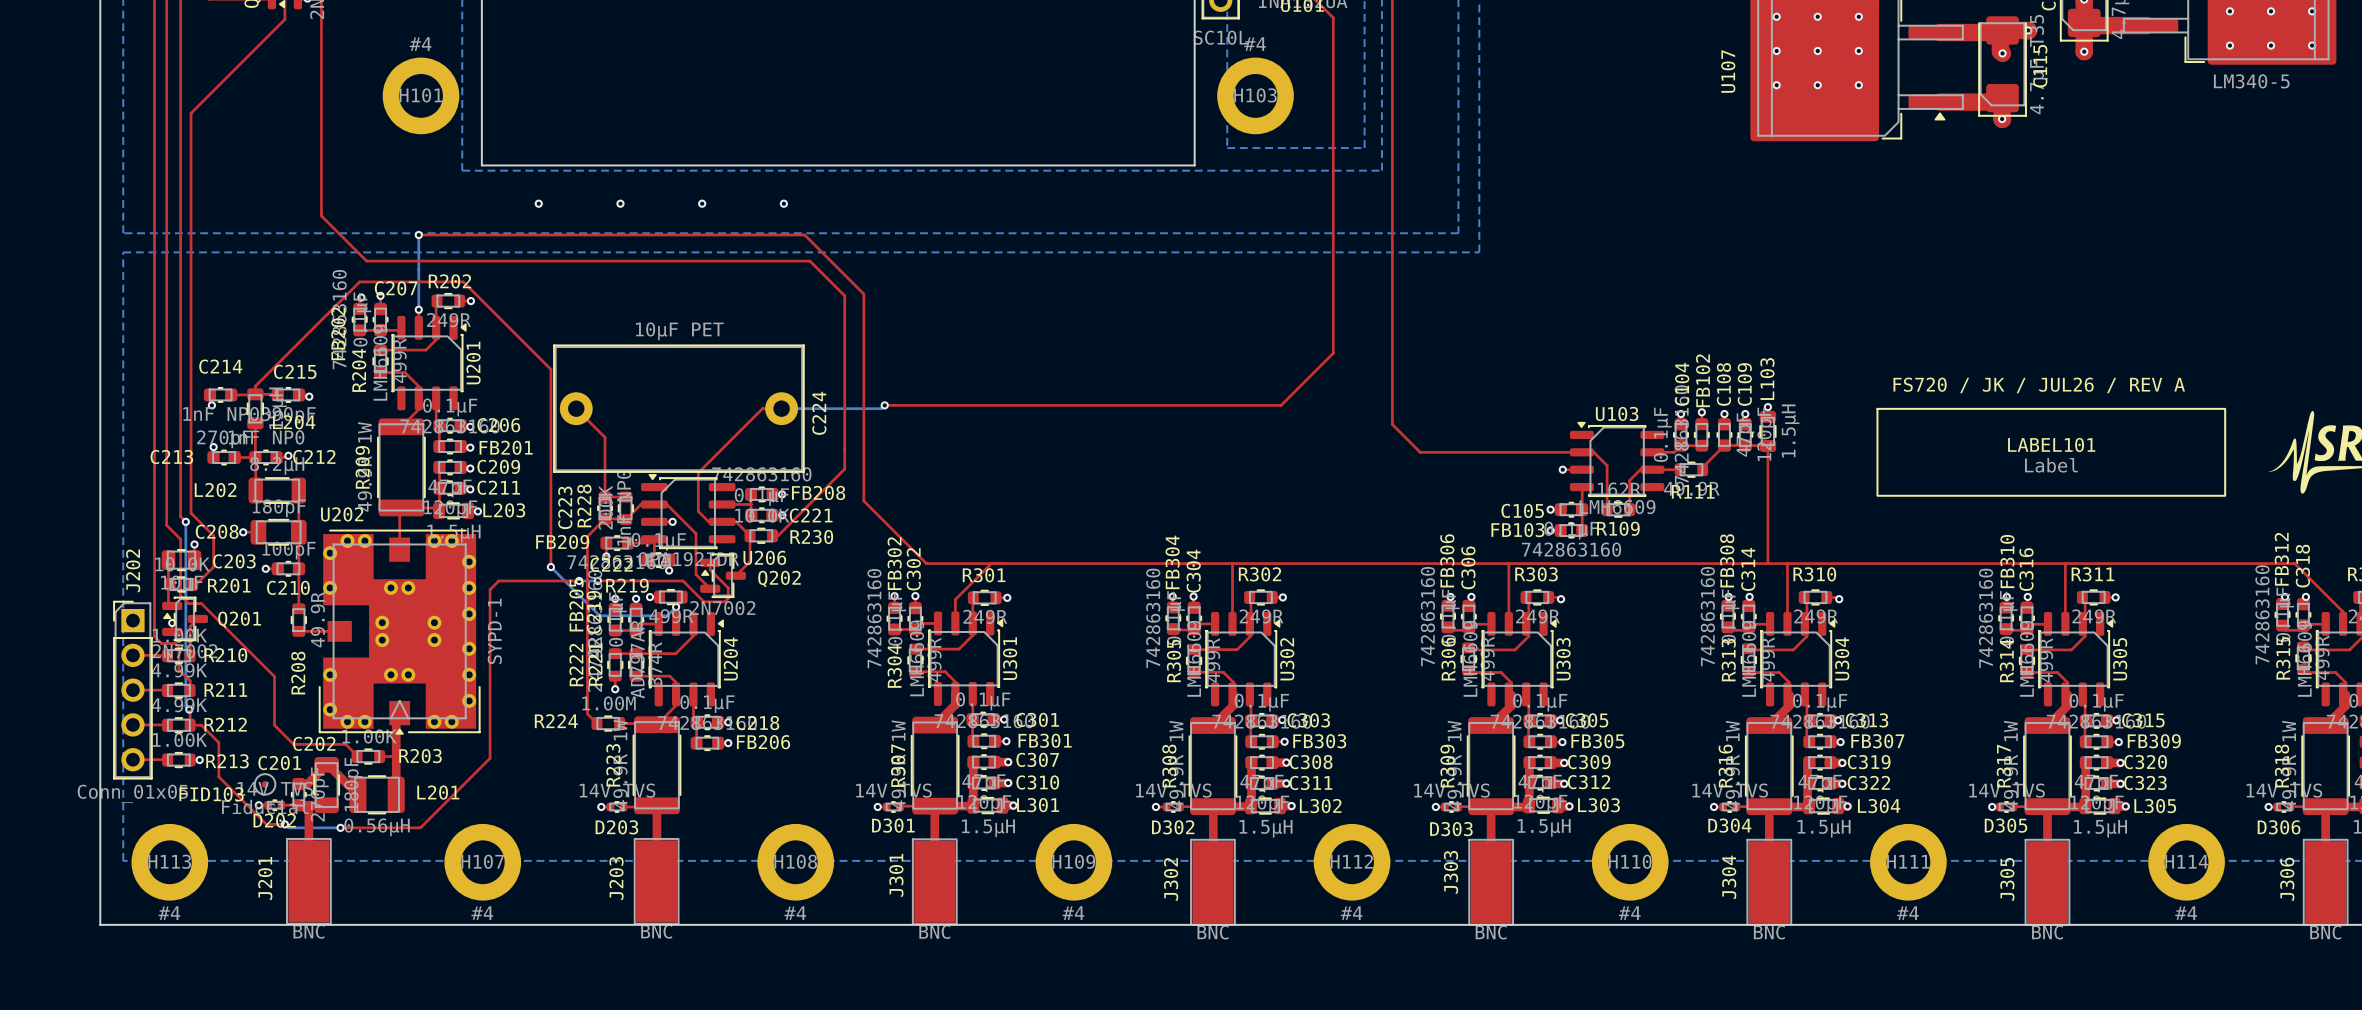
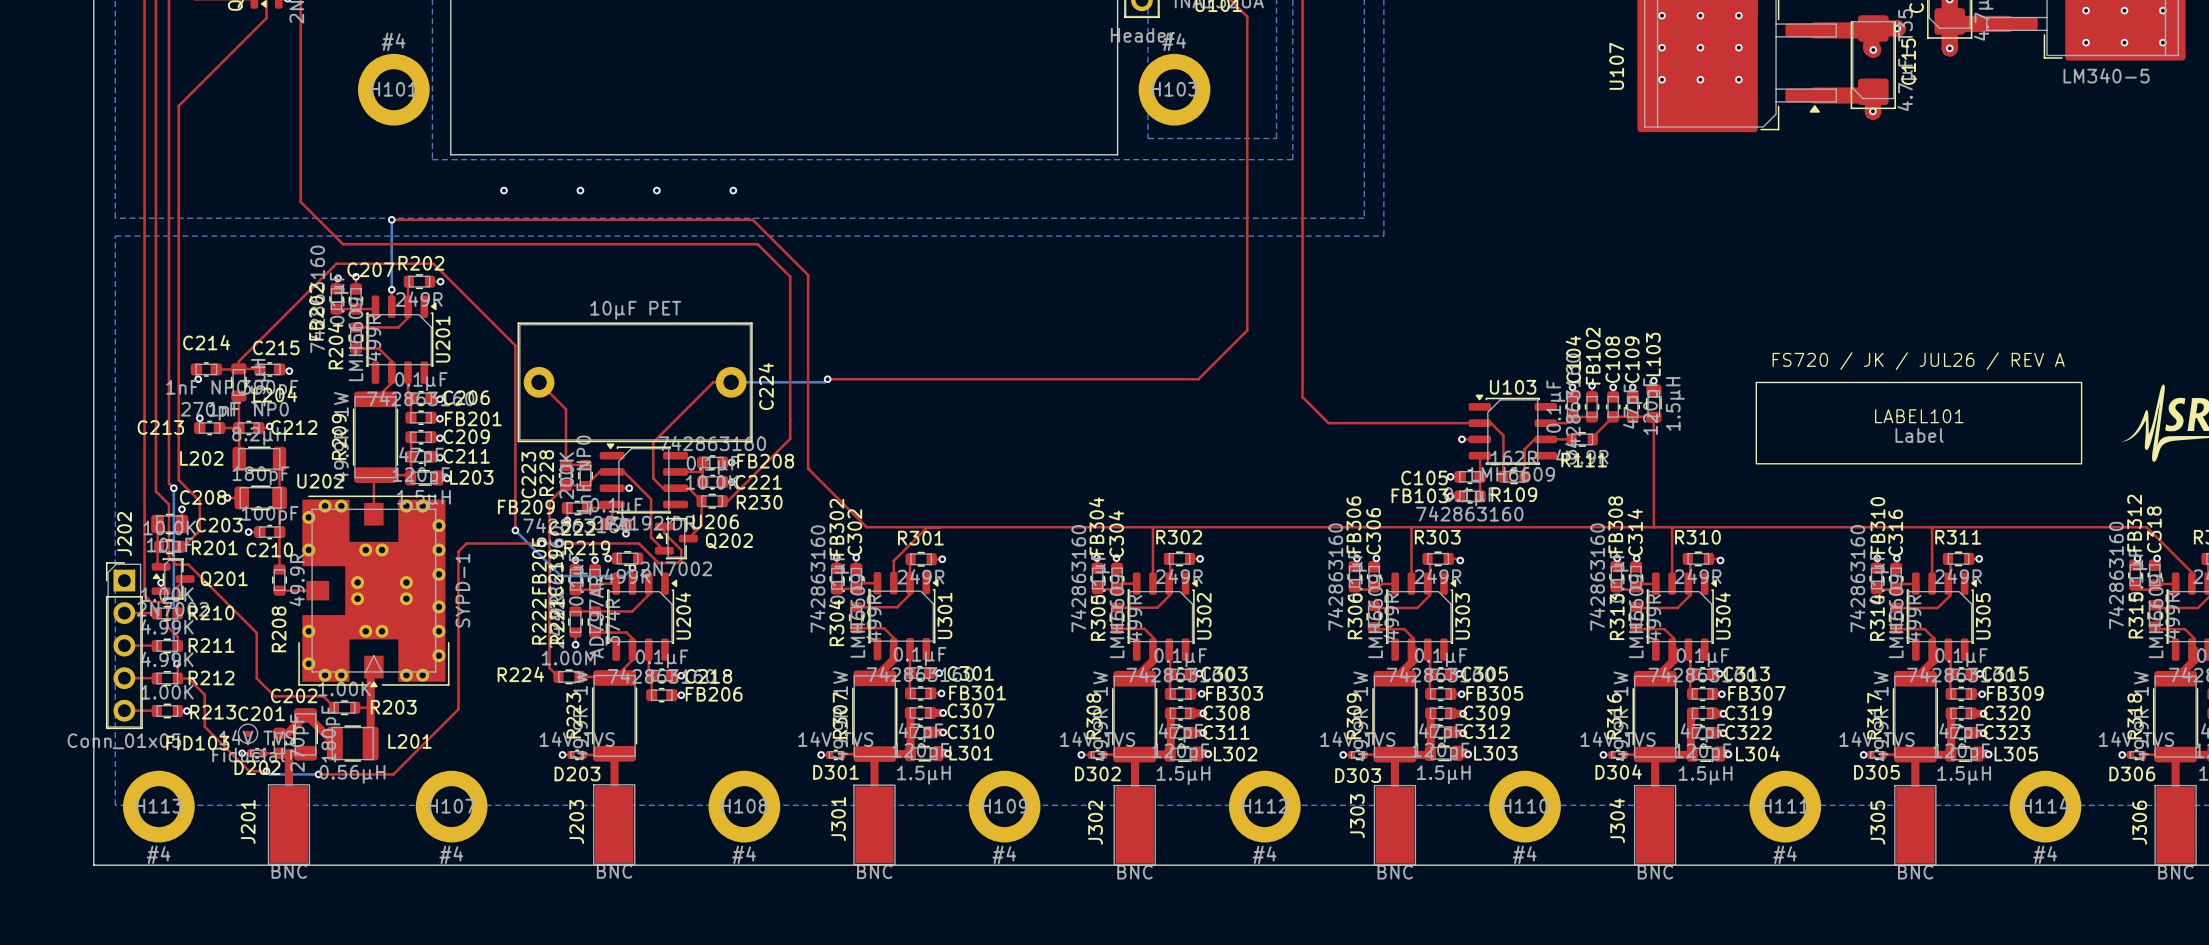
part value: SC10L (1220, 37) -> Header (1142, 35)

